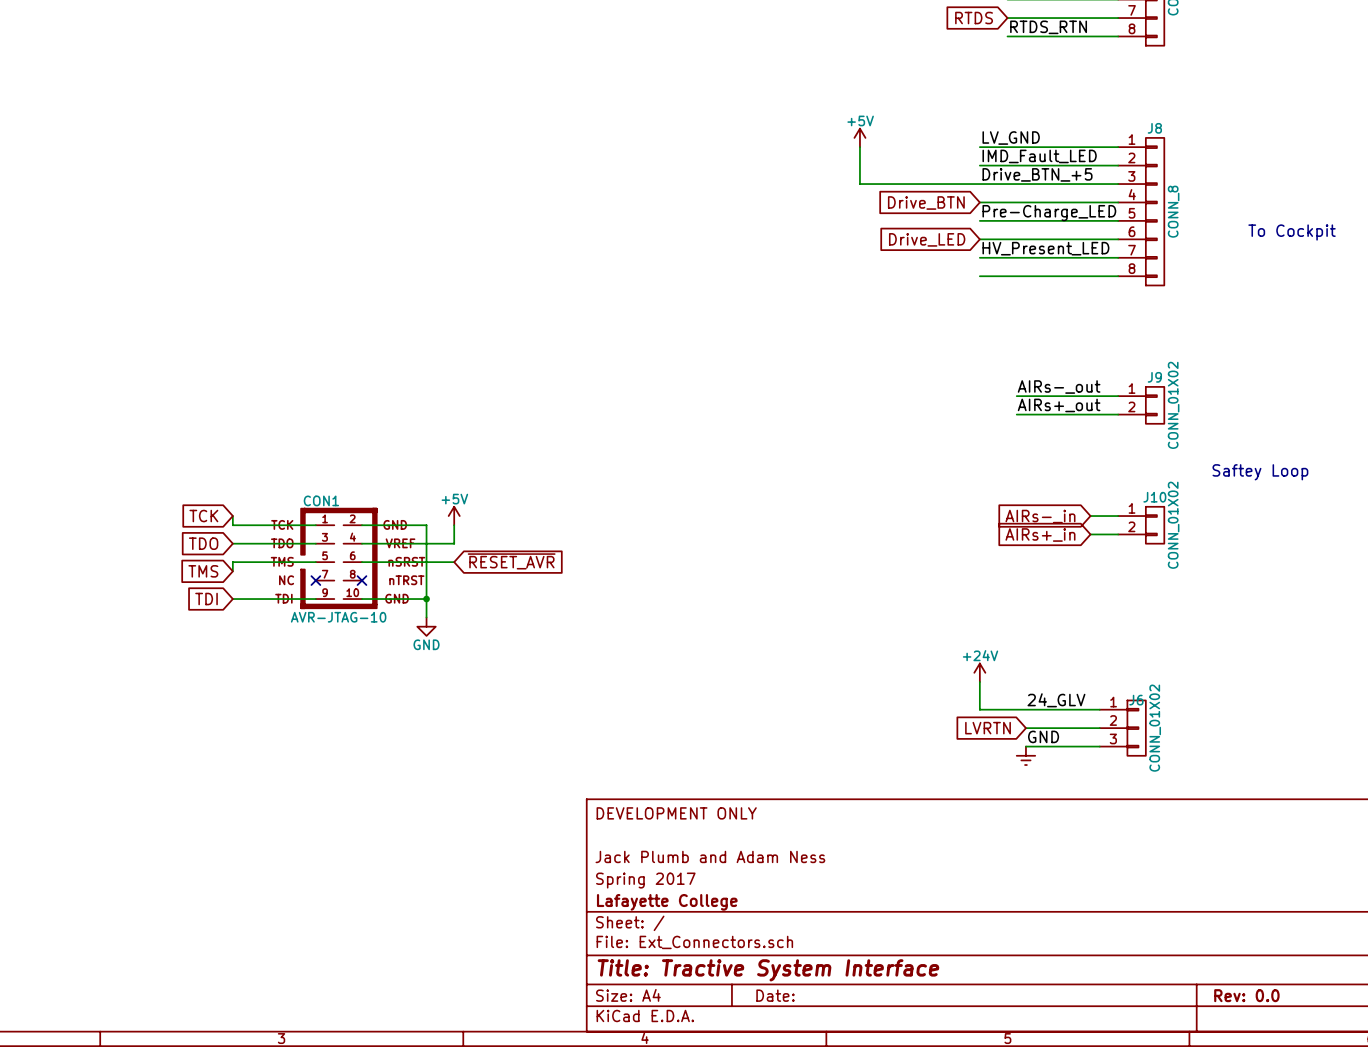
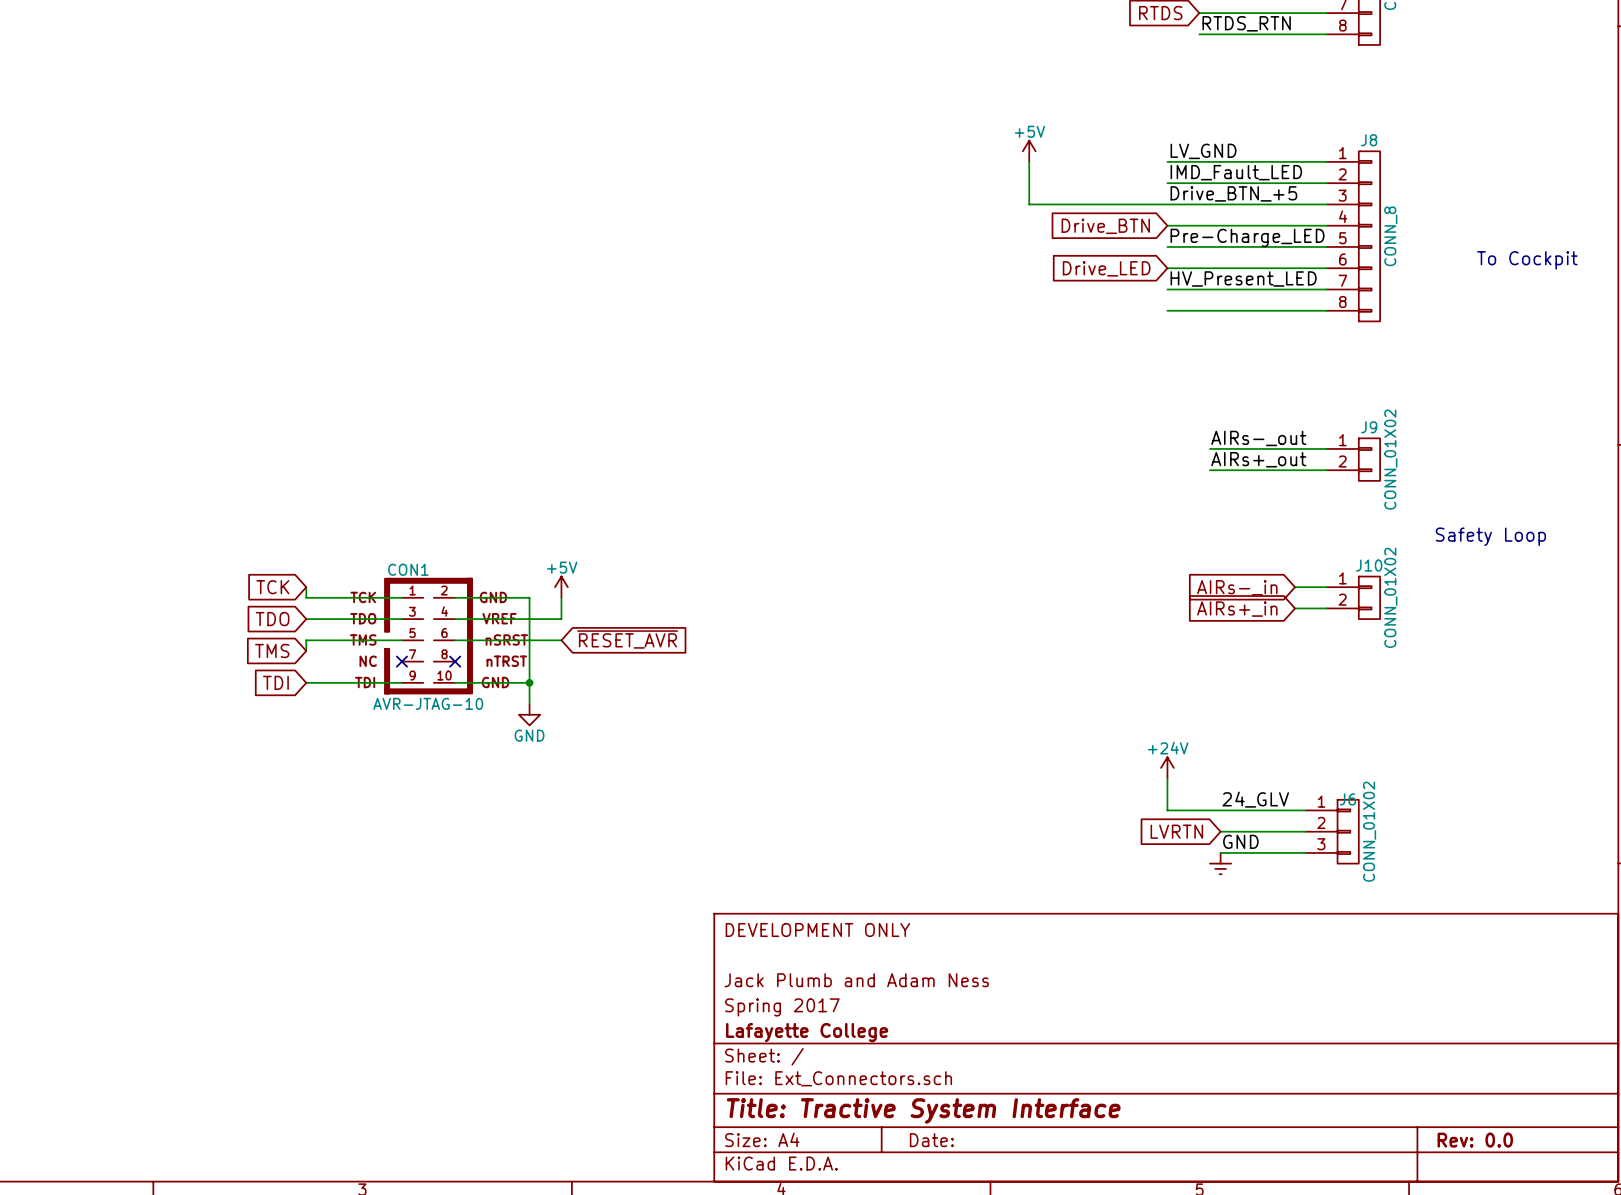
text: Saftey Loop (1260, 472) -> Safety Loop (1490, 536)

